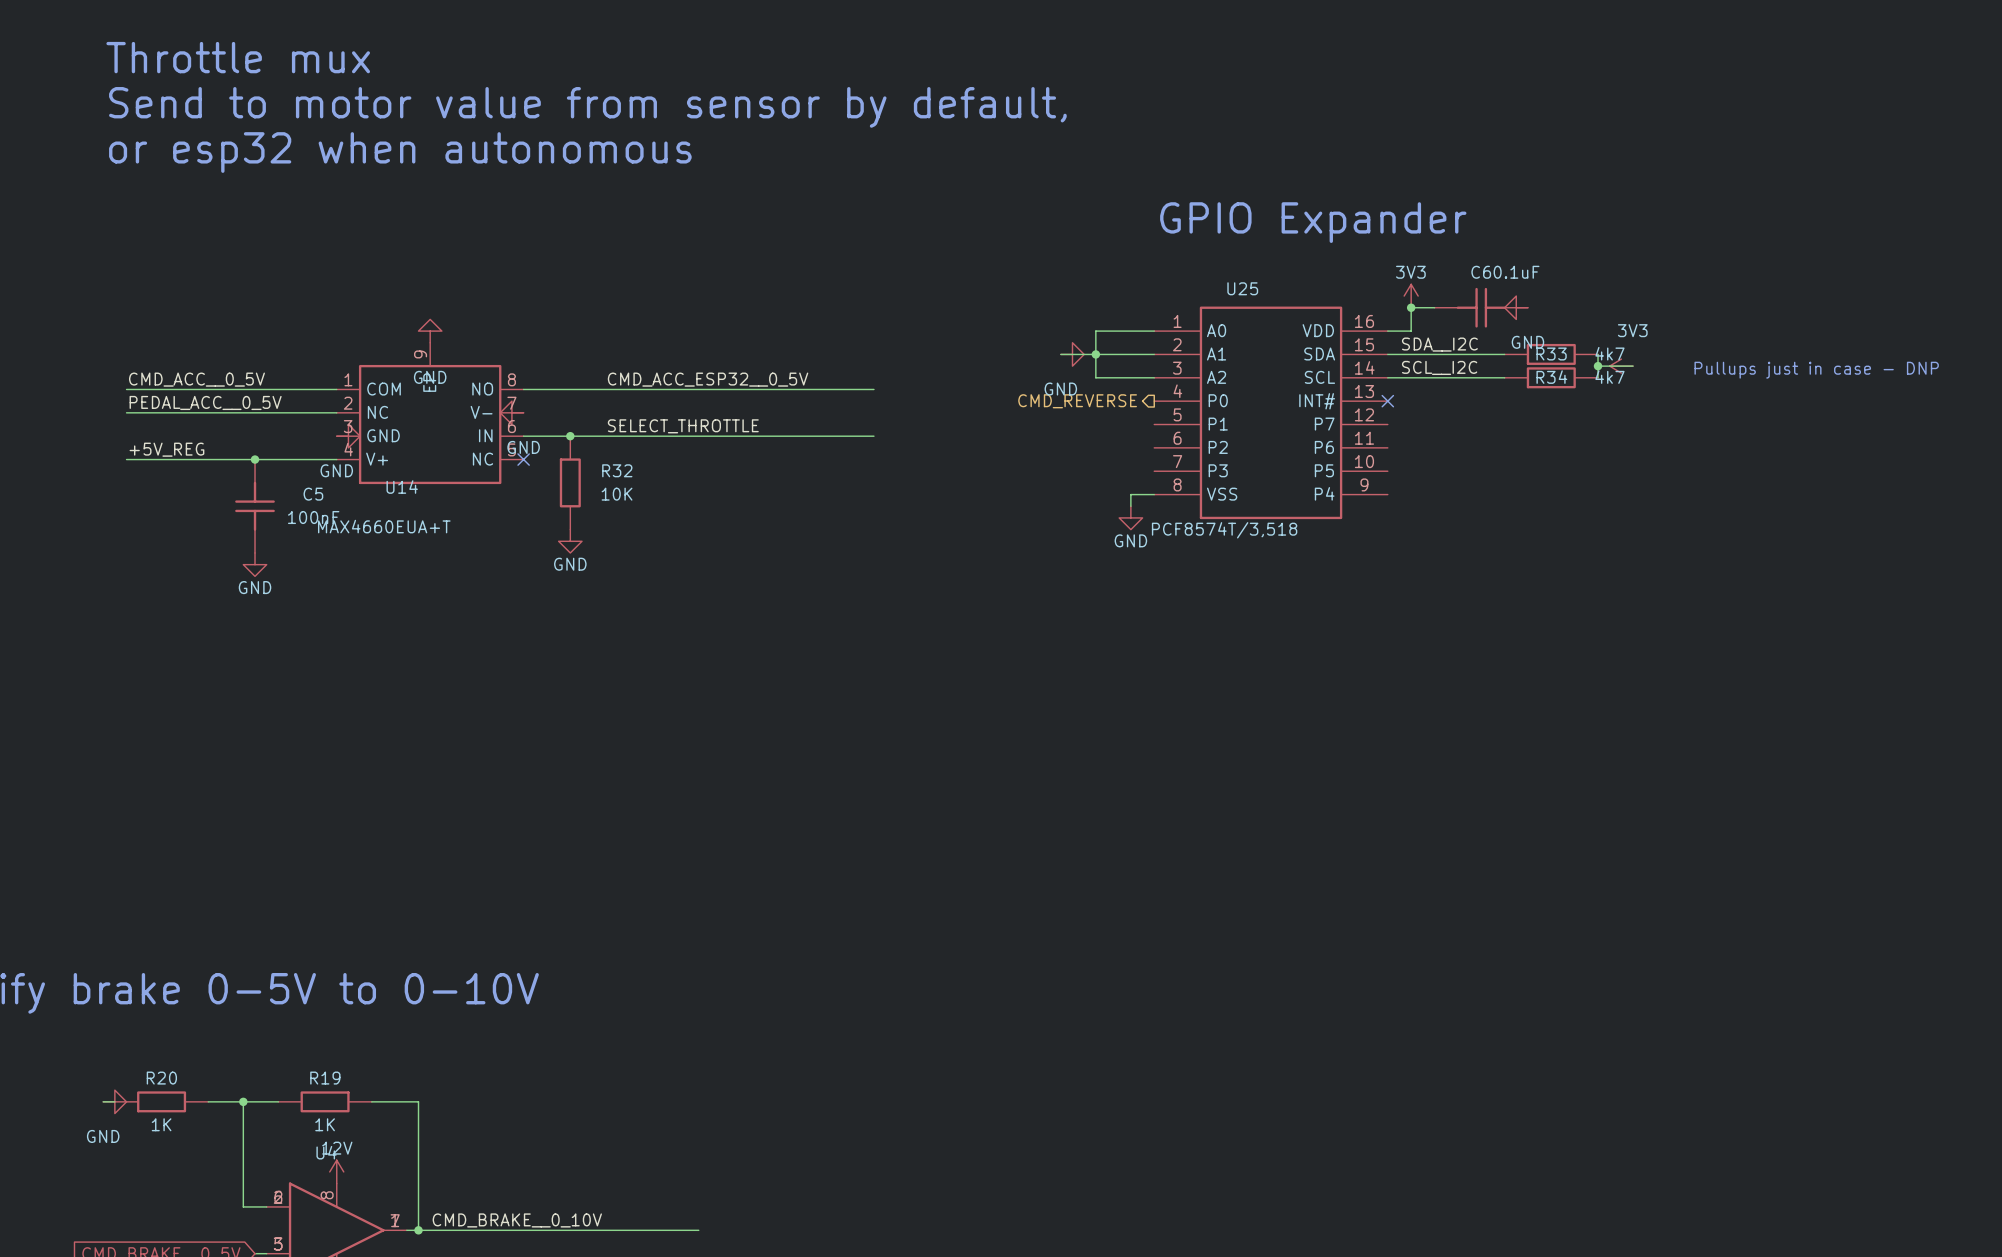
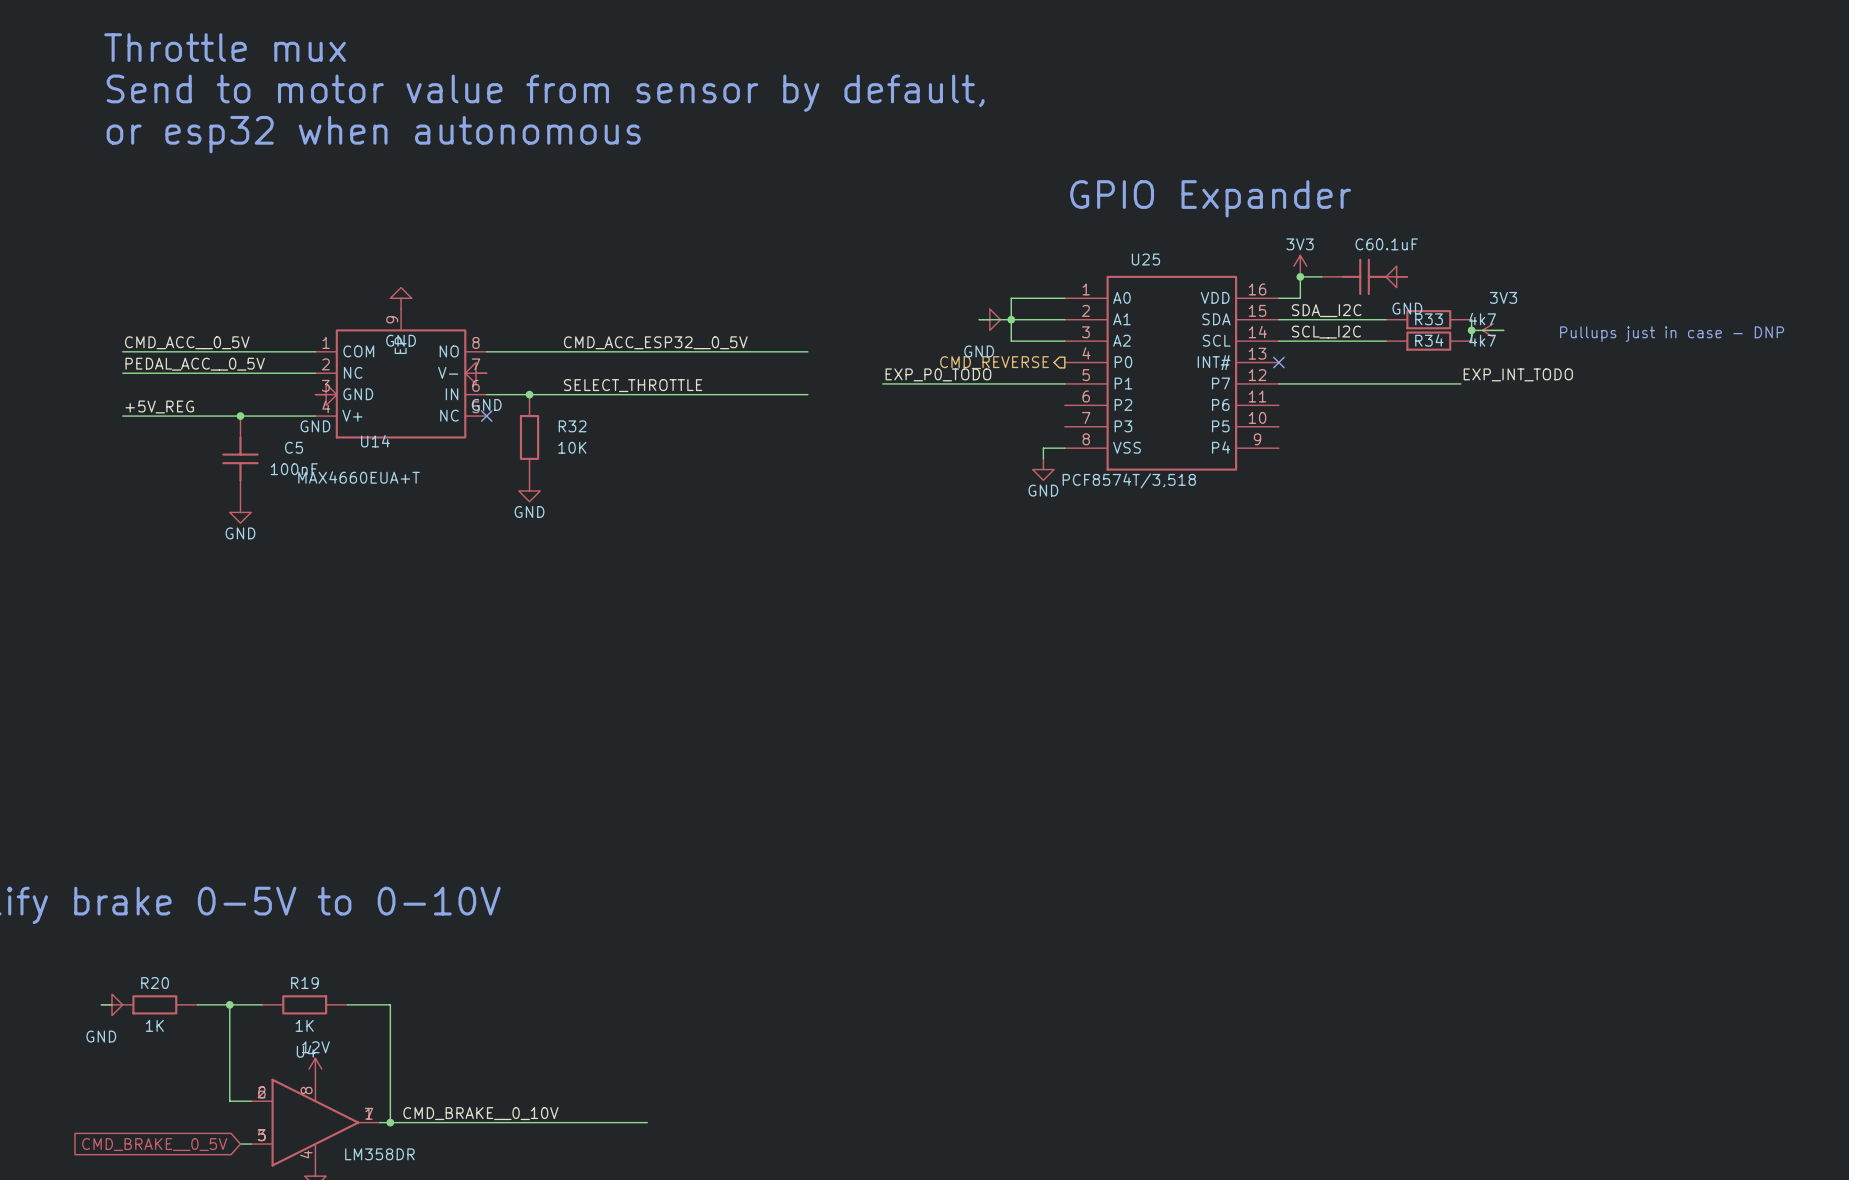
label: none -> EXP_P0_TODO (938, 374)
label: none -> EXP_INT_TODO (1518, 374)
wire: none -> (882, 383) (1064, 383)
wire: none -> (1278, 383) (1460, 383)

